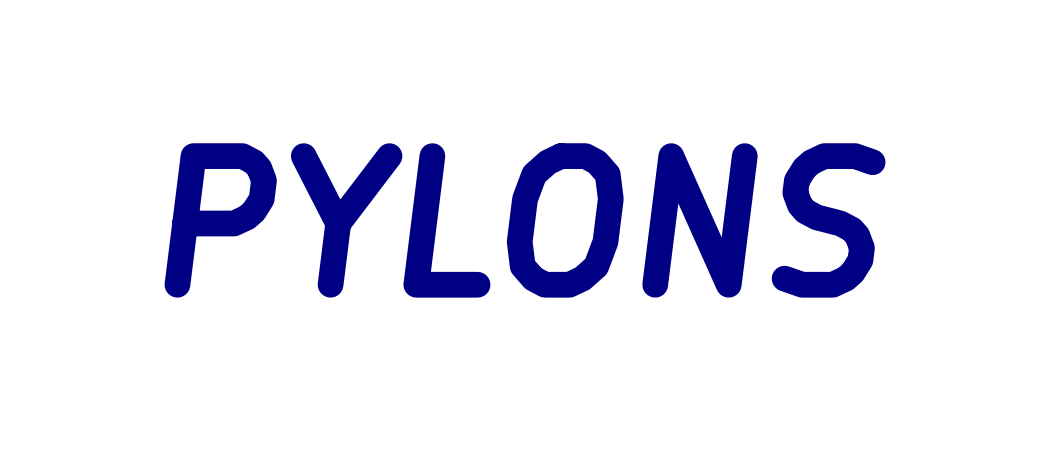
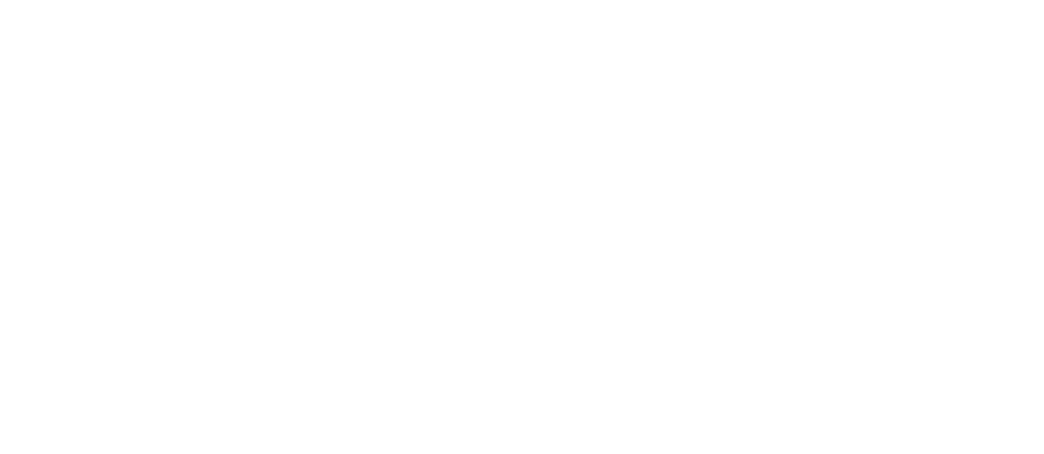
text: PYLONS (525, 220) -> none

